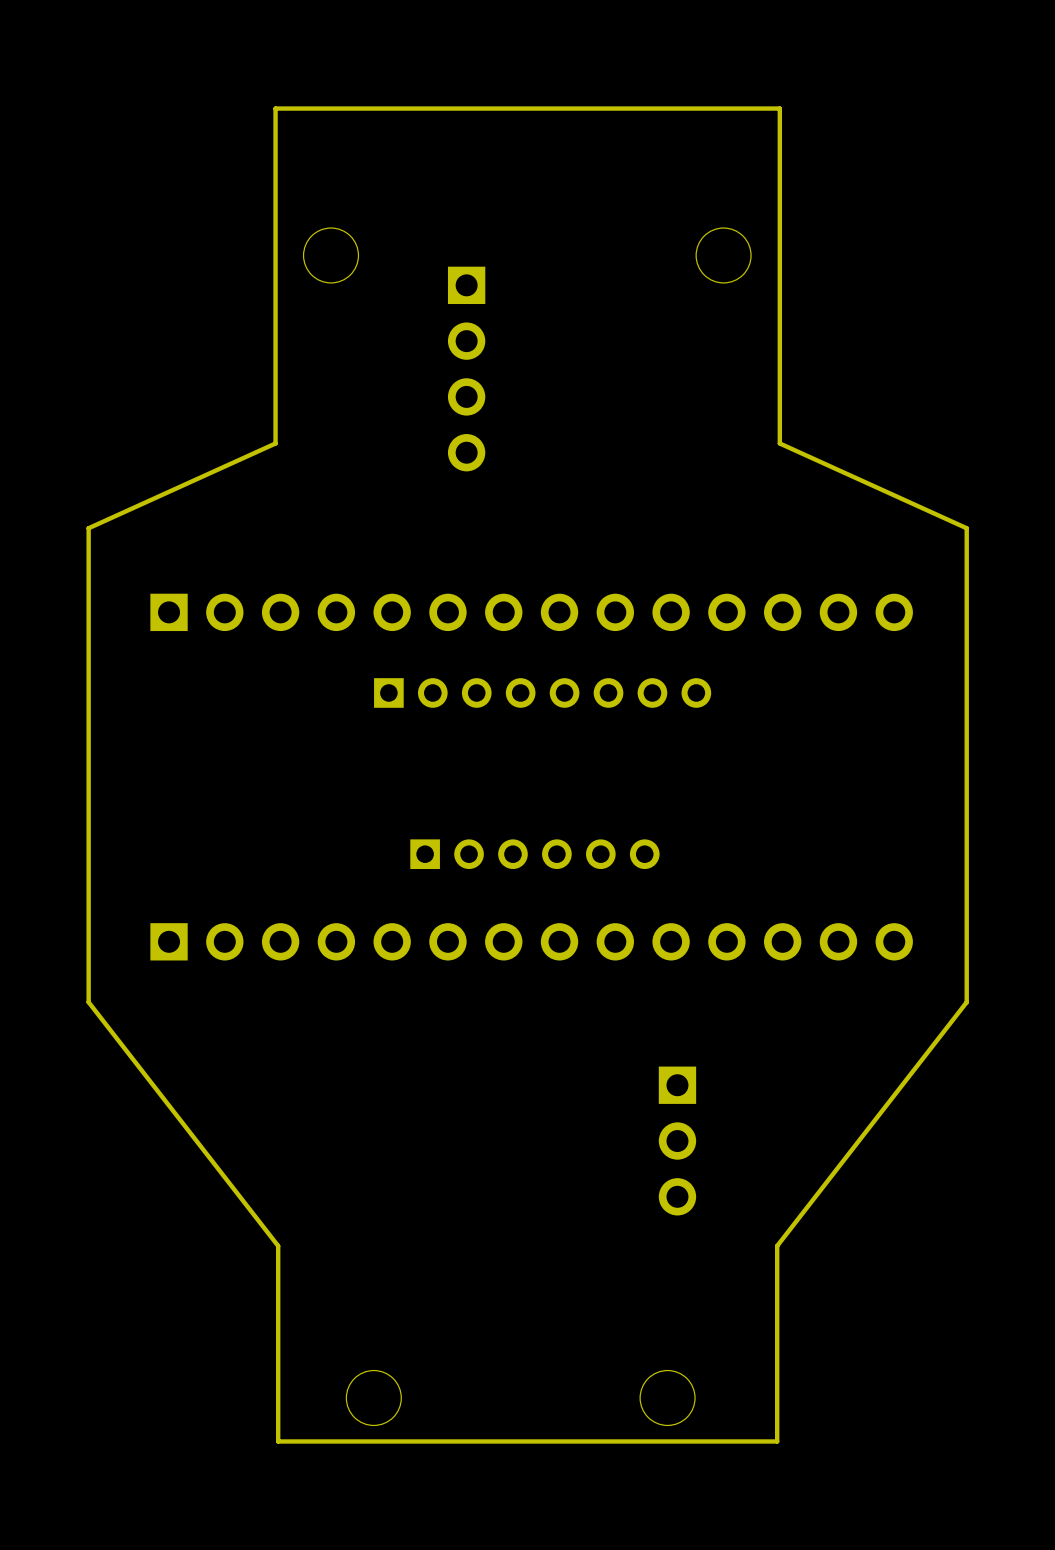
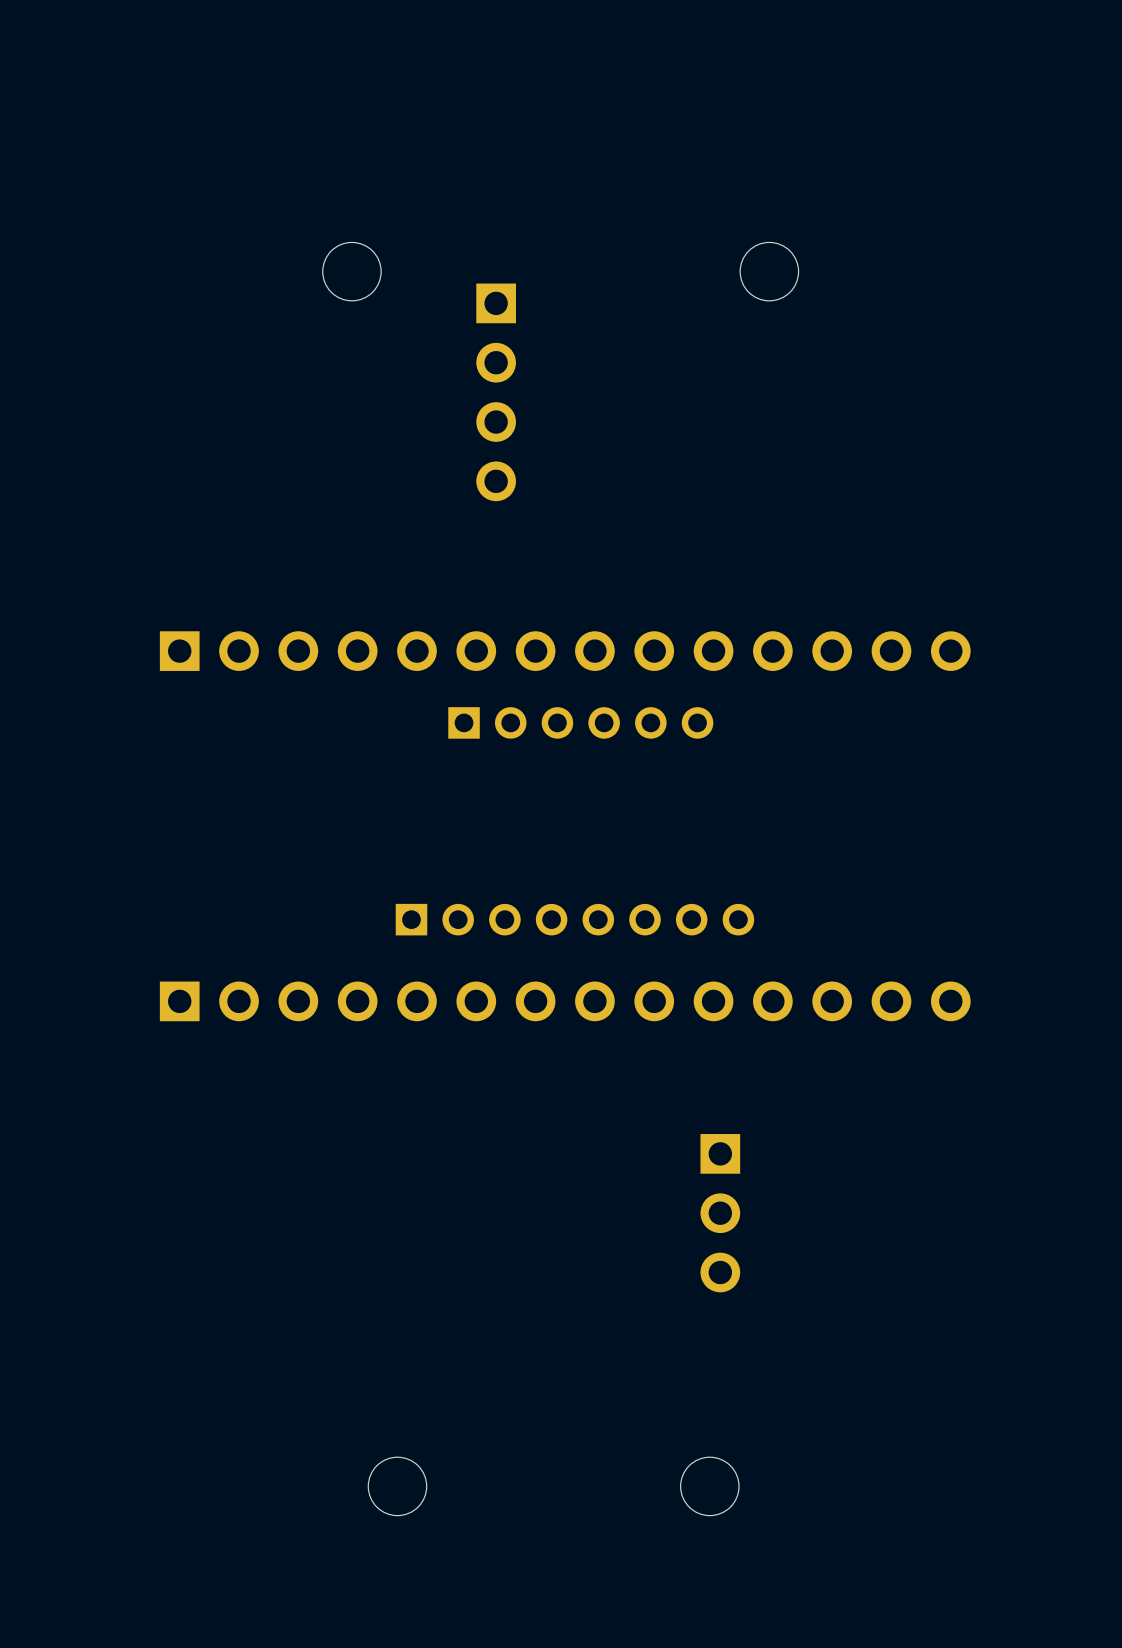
board edge: (779, 108) (779, 443) (966, 528) (966, 1002) (777, 1245) (777, 1441) (278, 1441) (278, 1245) (88, 1002) (88, 528) (275, 443) (275, 108) (779, 108) -> none
part footprint: [374, 678, 712, 708] -> [448, 707, 714, 739]
part footprint: [410, 839, 660, 870] -> [395, 903, 755, 936]

